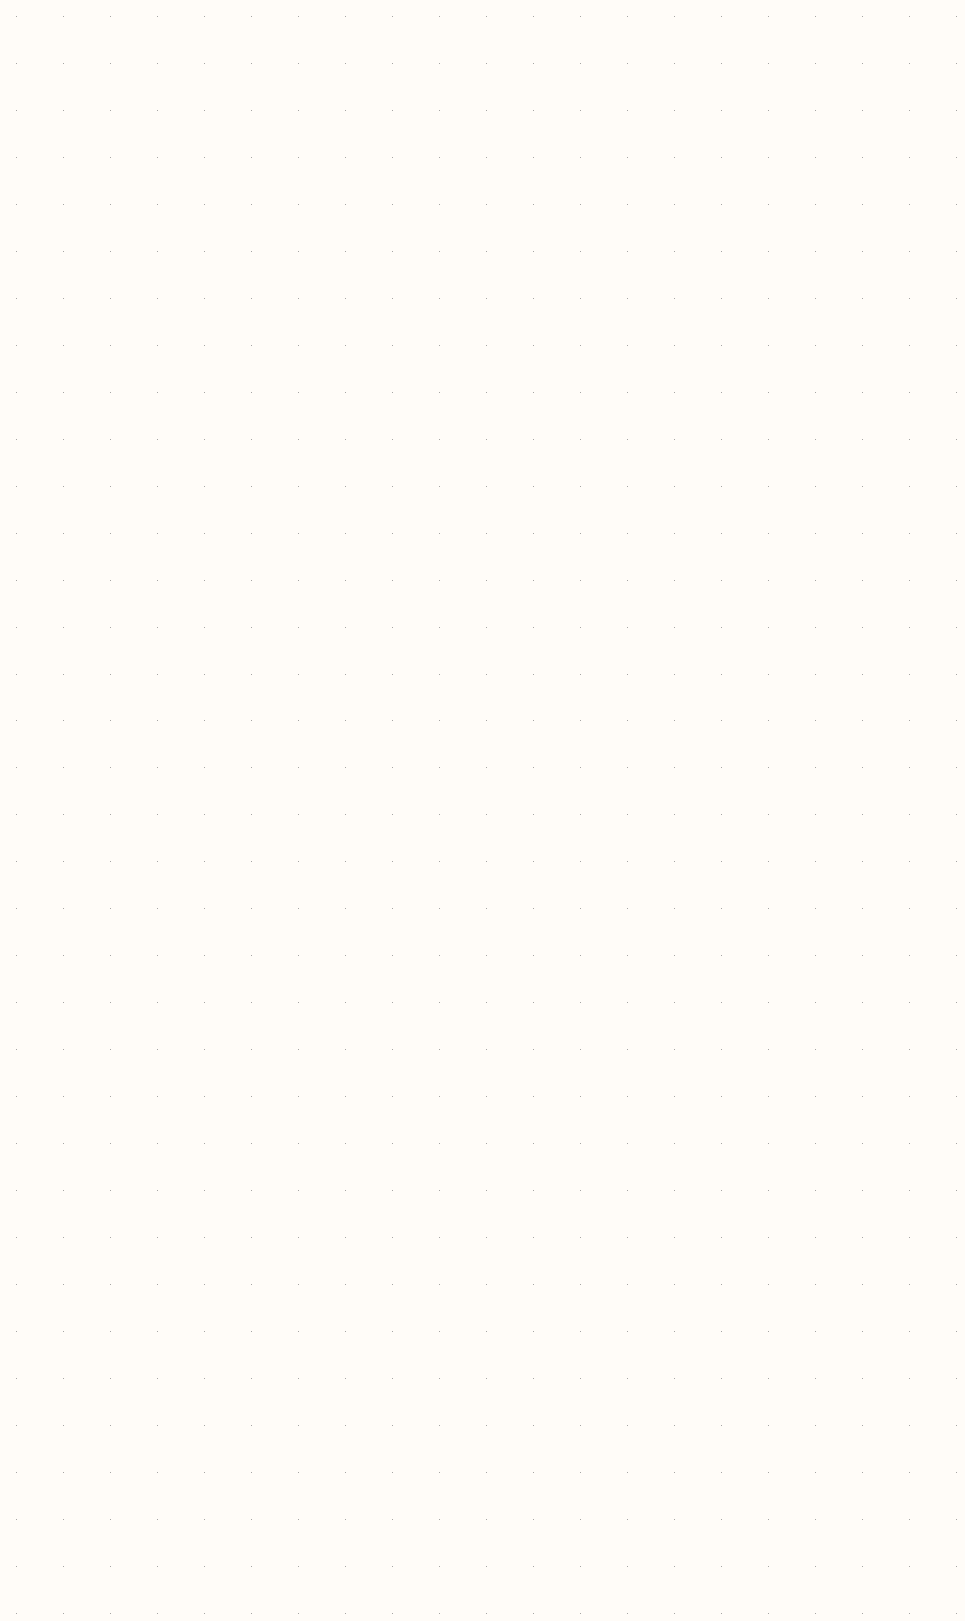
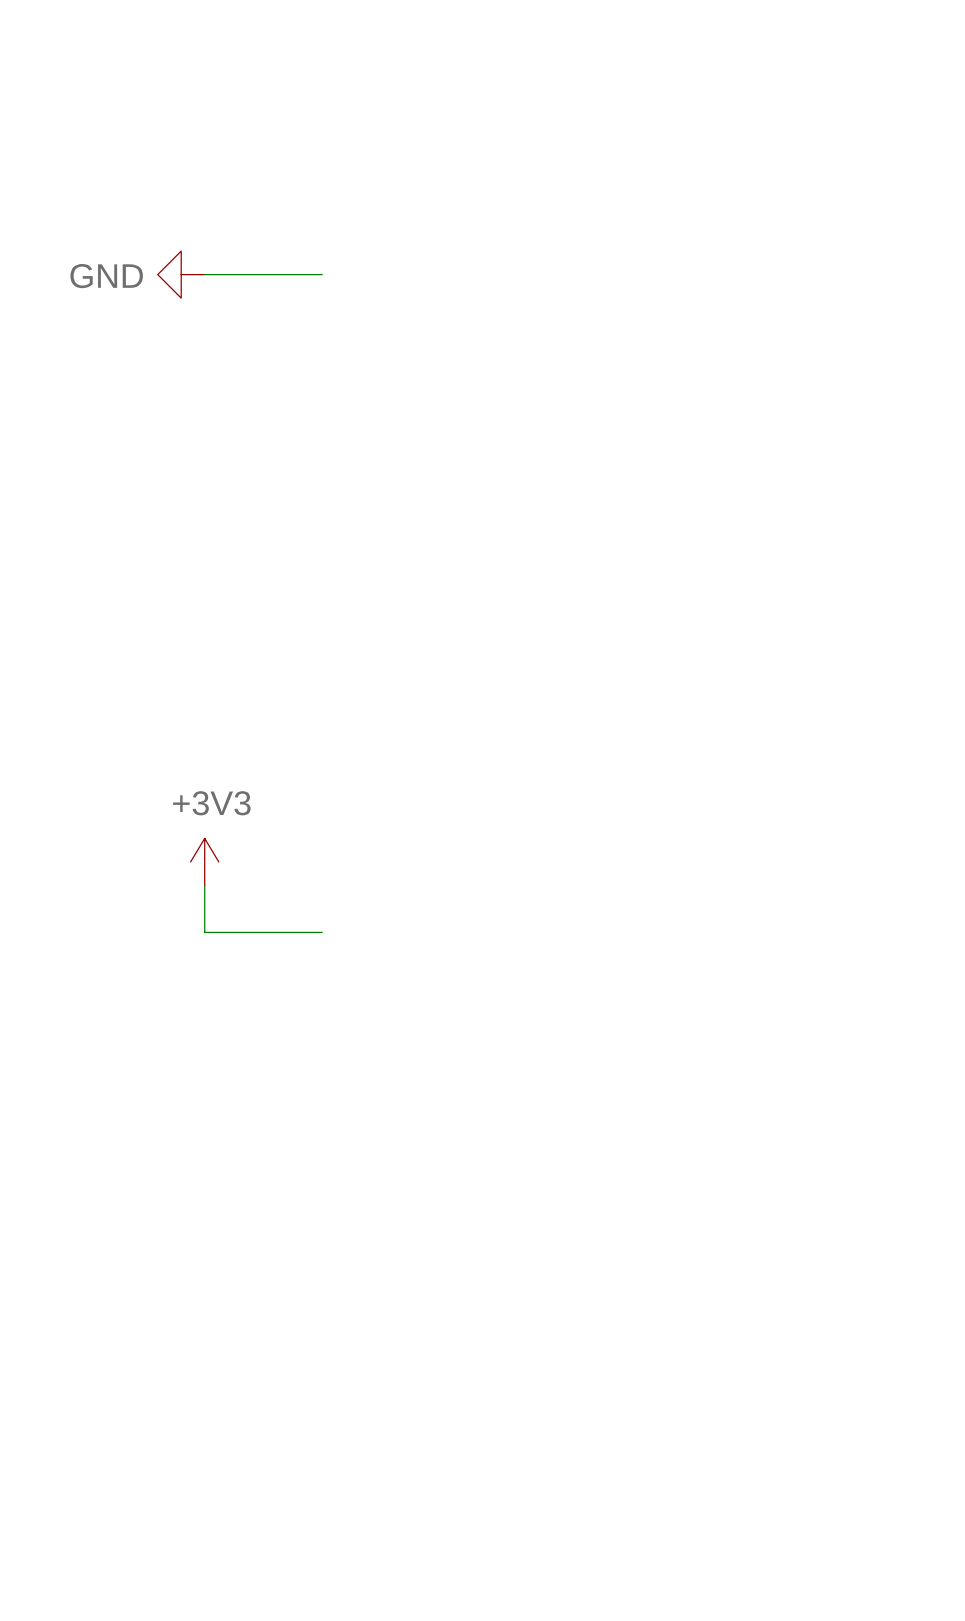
power symbol: none -> GND (181, 274)
wire: none -> (204, 274) (322, 274)
power symbol: none -> +3V3 (204, 861)
wire: none -> (204, 885) (204, 932) (322, 932)

